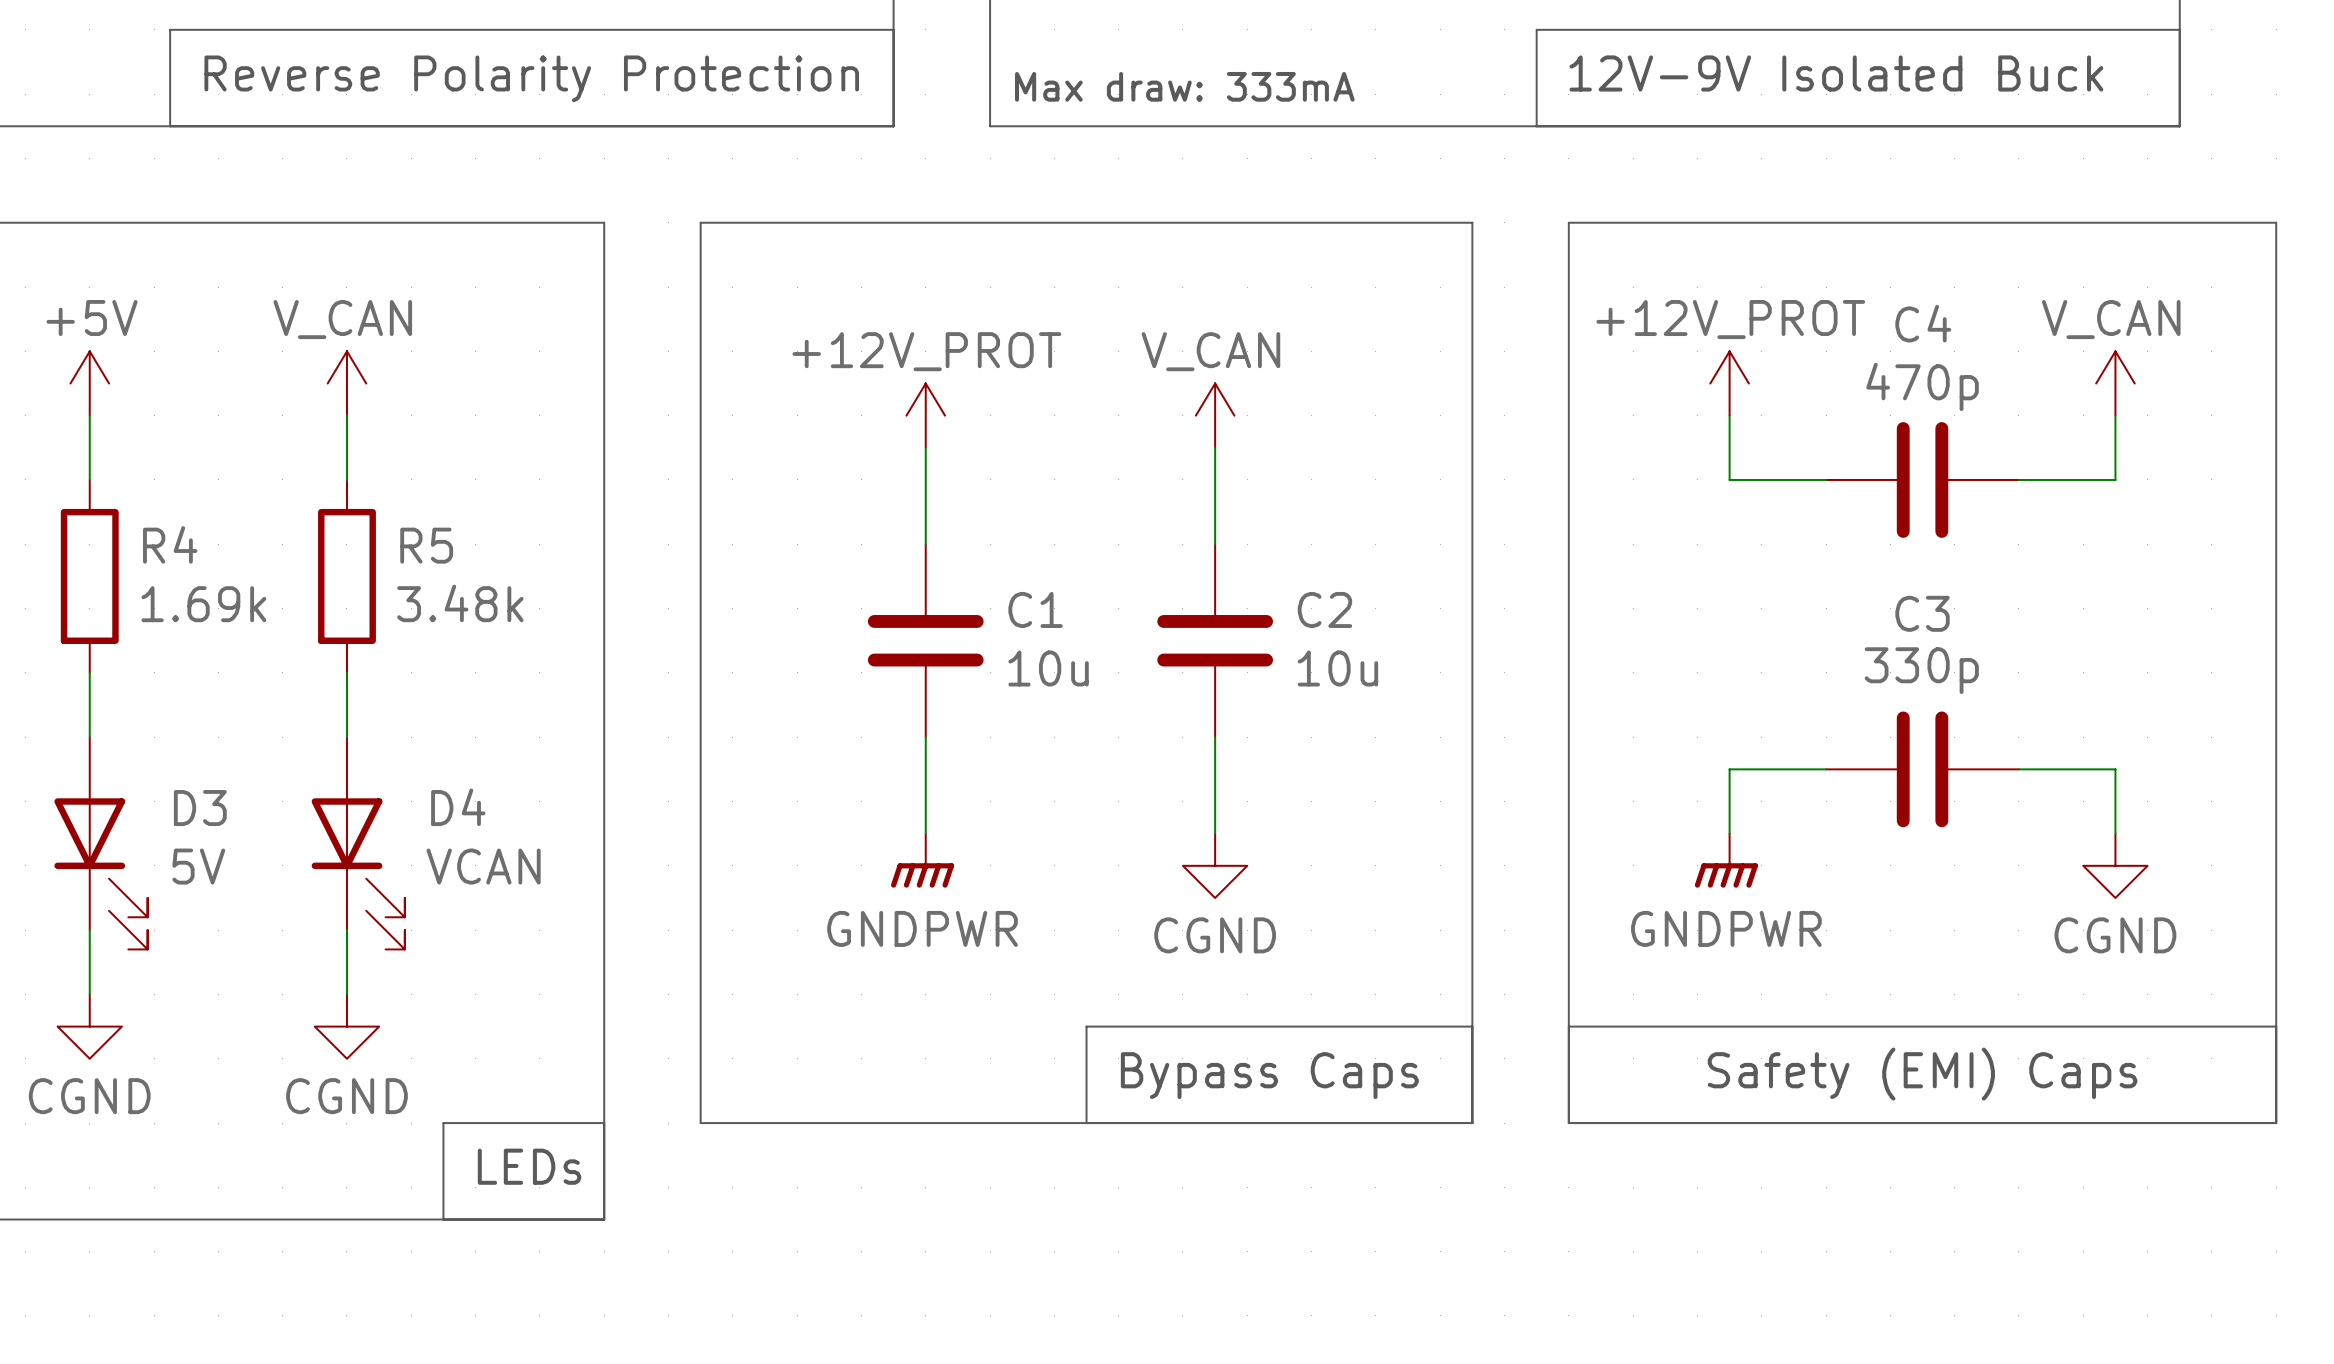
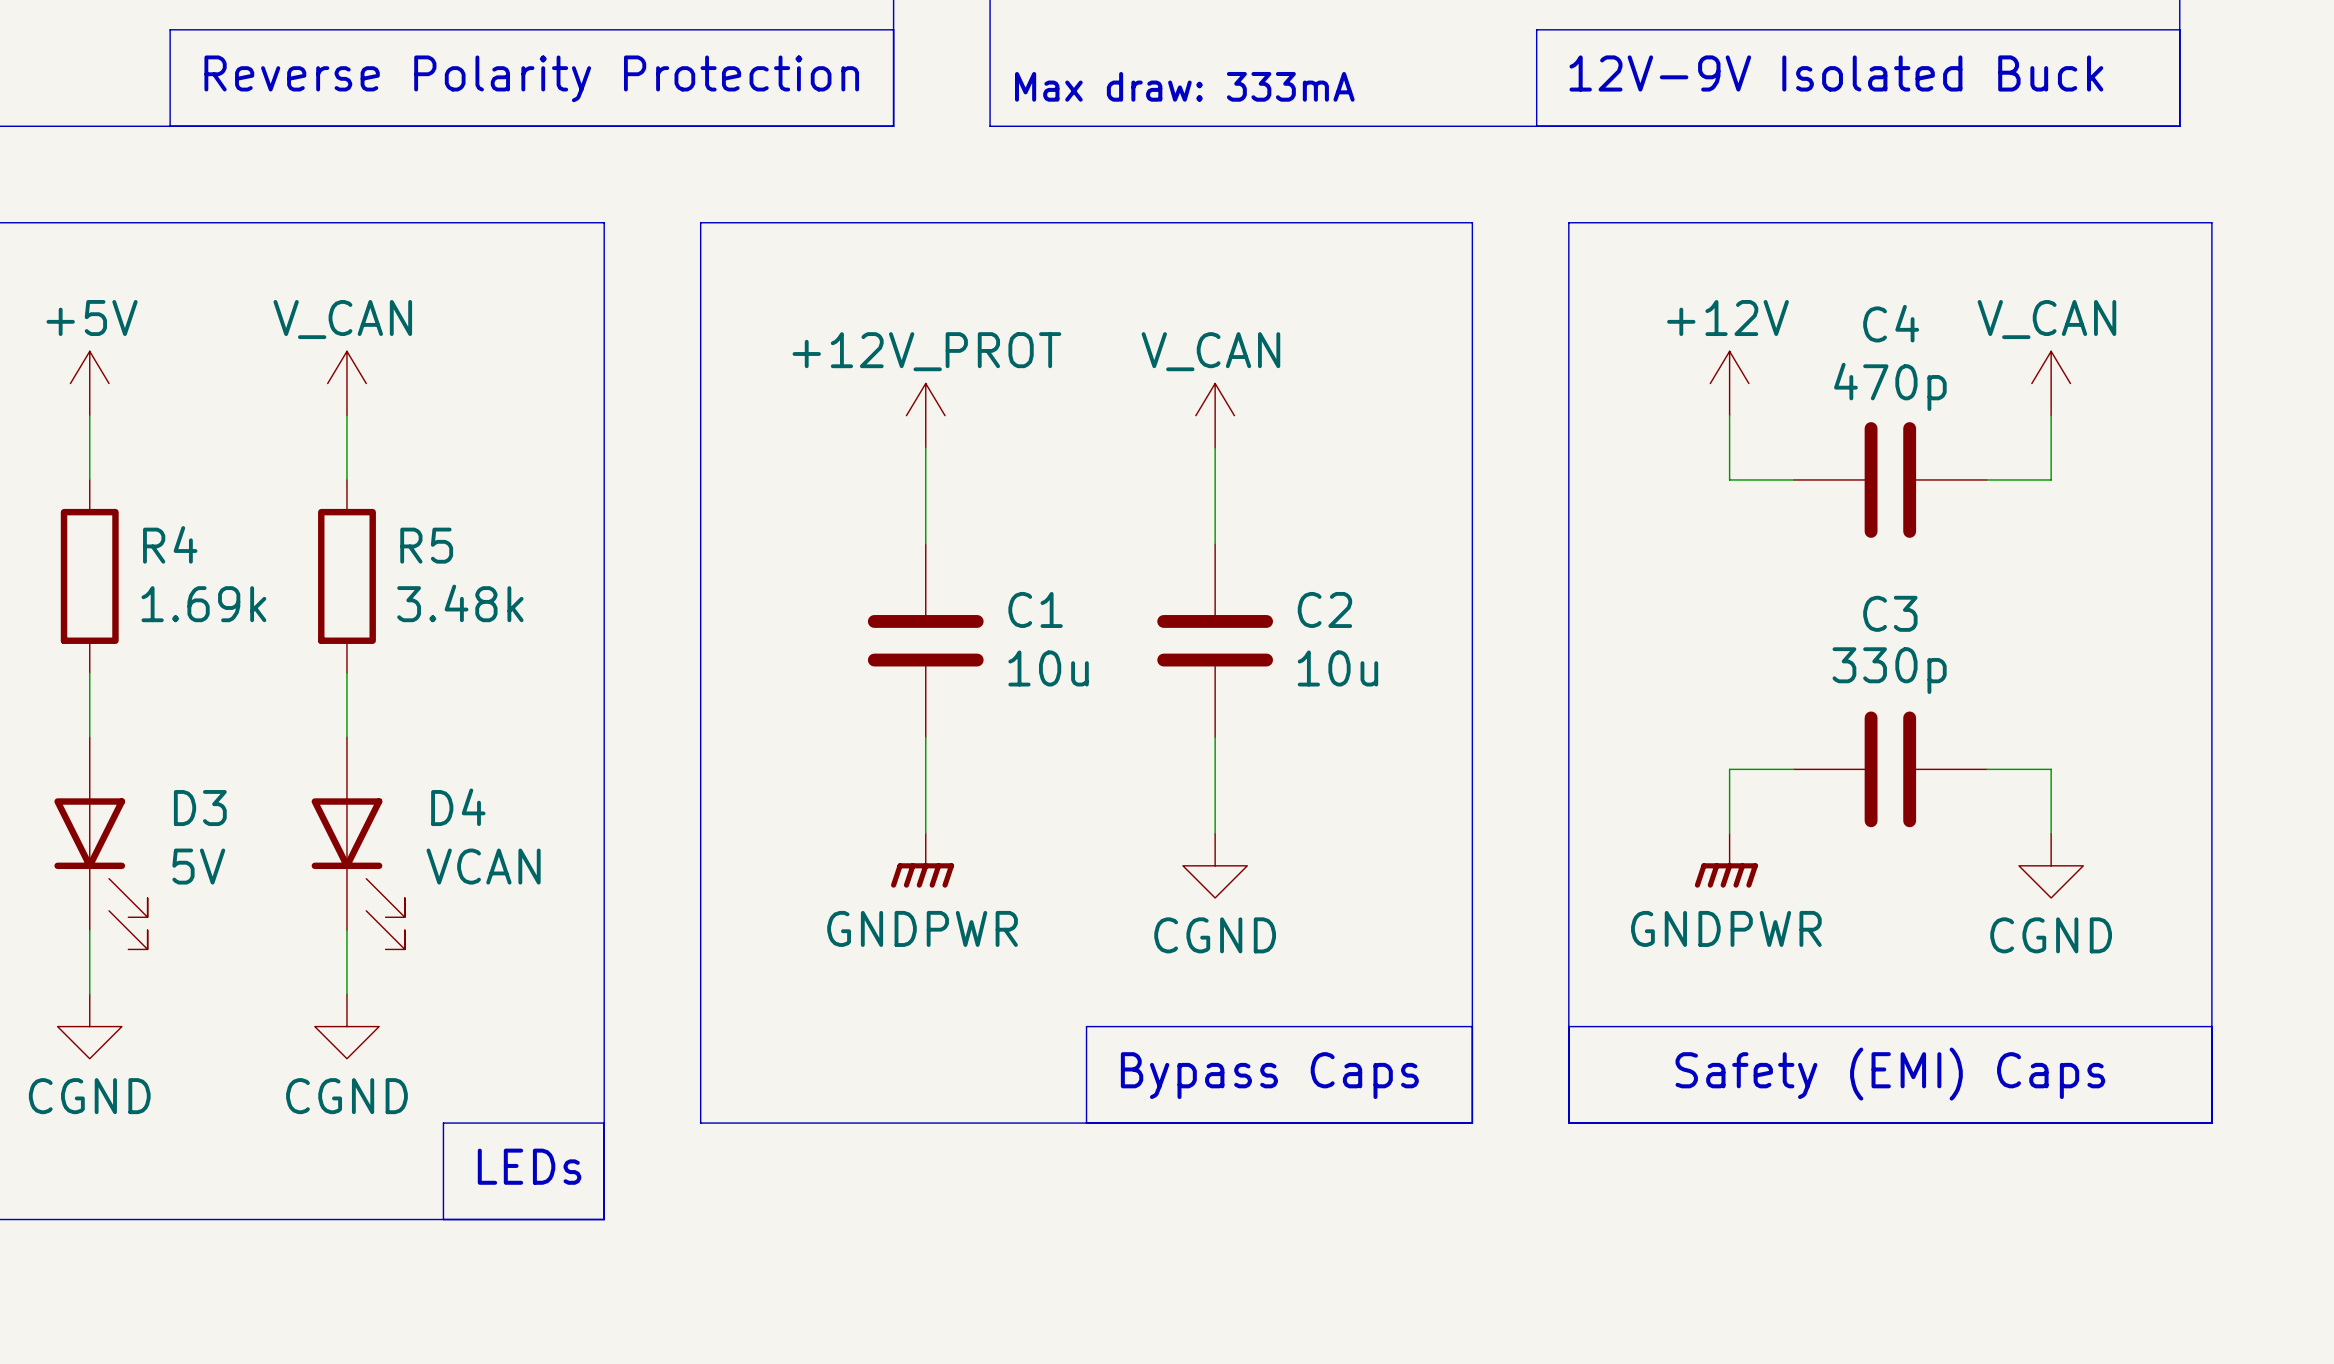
line: (2211, 222) (2276, 222) (2276, 1123) (2211, 1123) -> (2211, 222) (2211, 1123)
power symbol: +12V_PROT (1729, 383) -> +12V (1729, 383)
power symbol position: V_CAN (2115, 383) -> V_CAN (2051, 383)
wire: (2115, 415) (2115, 479) (2051, 479) -> (2051, 415) (2051, 479)
C4 position: (1922, 479) -> (1890, 479)
C3 position: (1922, 769) -> (1890, 769)
wire: (2051, 769) (2115, 769) (2115, 833) -> (2051, 769) (2051, 833)
power symbol position: CGND (2115, 865) -> CGND (2051, 865)
line: (2211, 1026) (2276, 1026) -> none
text position: Safety (EMI) Caps (1922, 1074) -> Safety (EMI) Caps (1890, 1074)

